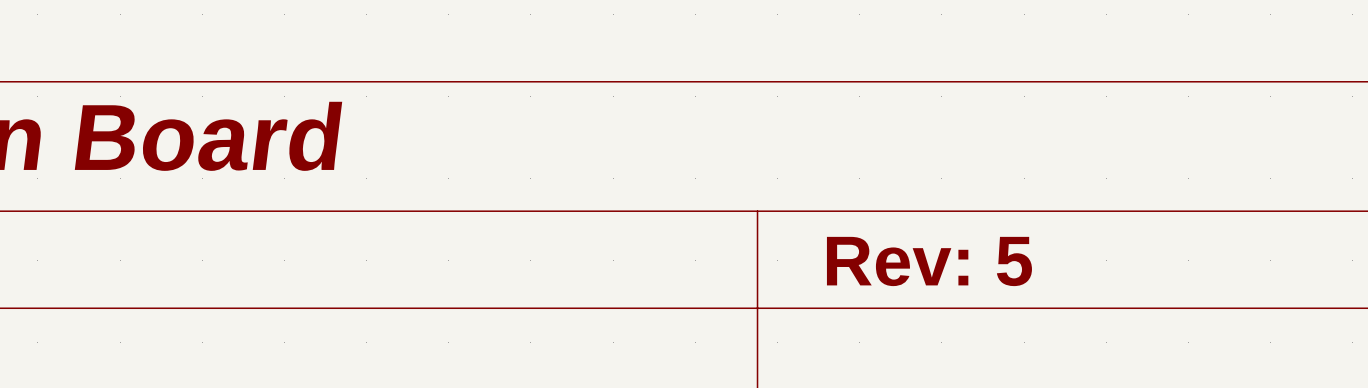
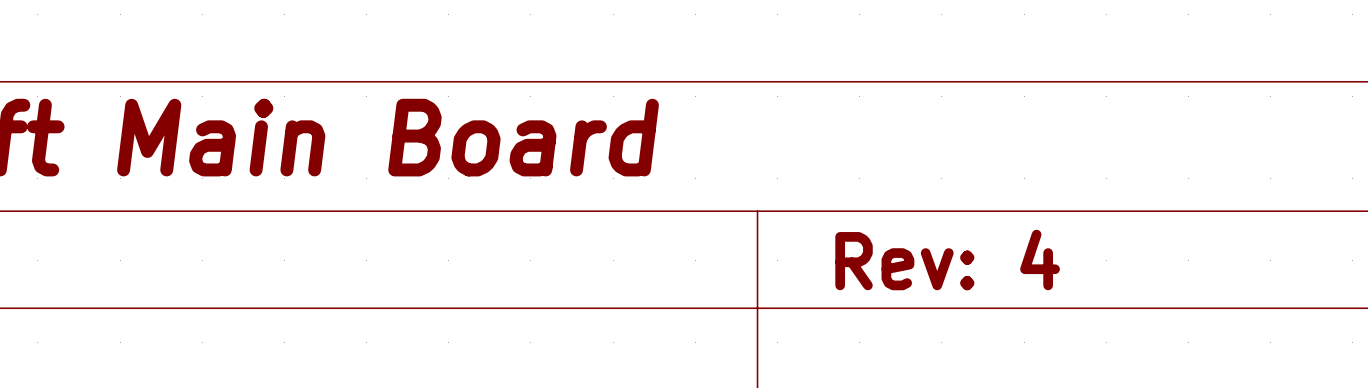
title block: Rev: 5 (929, 261) -> Rev: 4 (947, 259)

